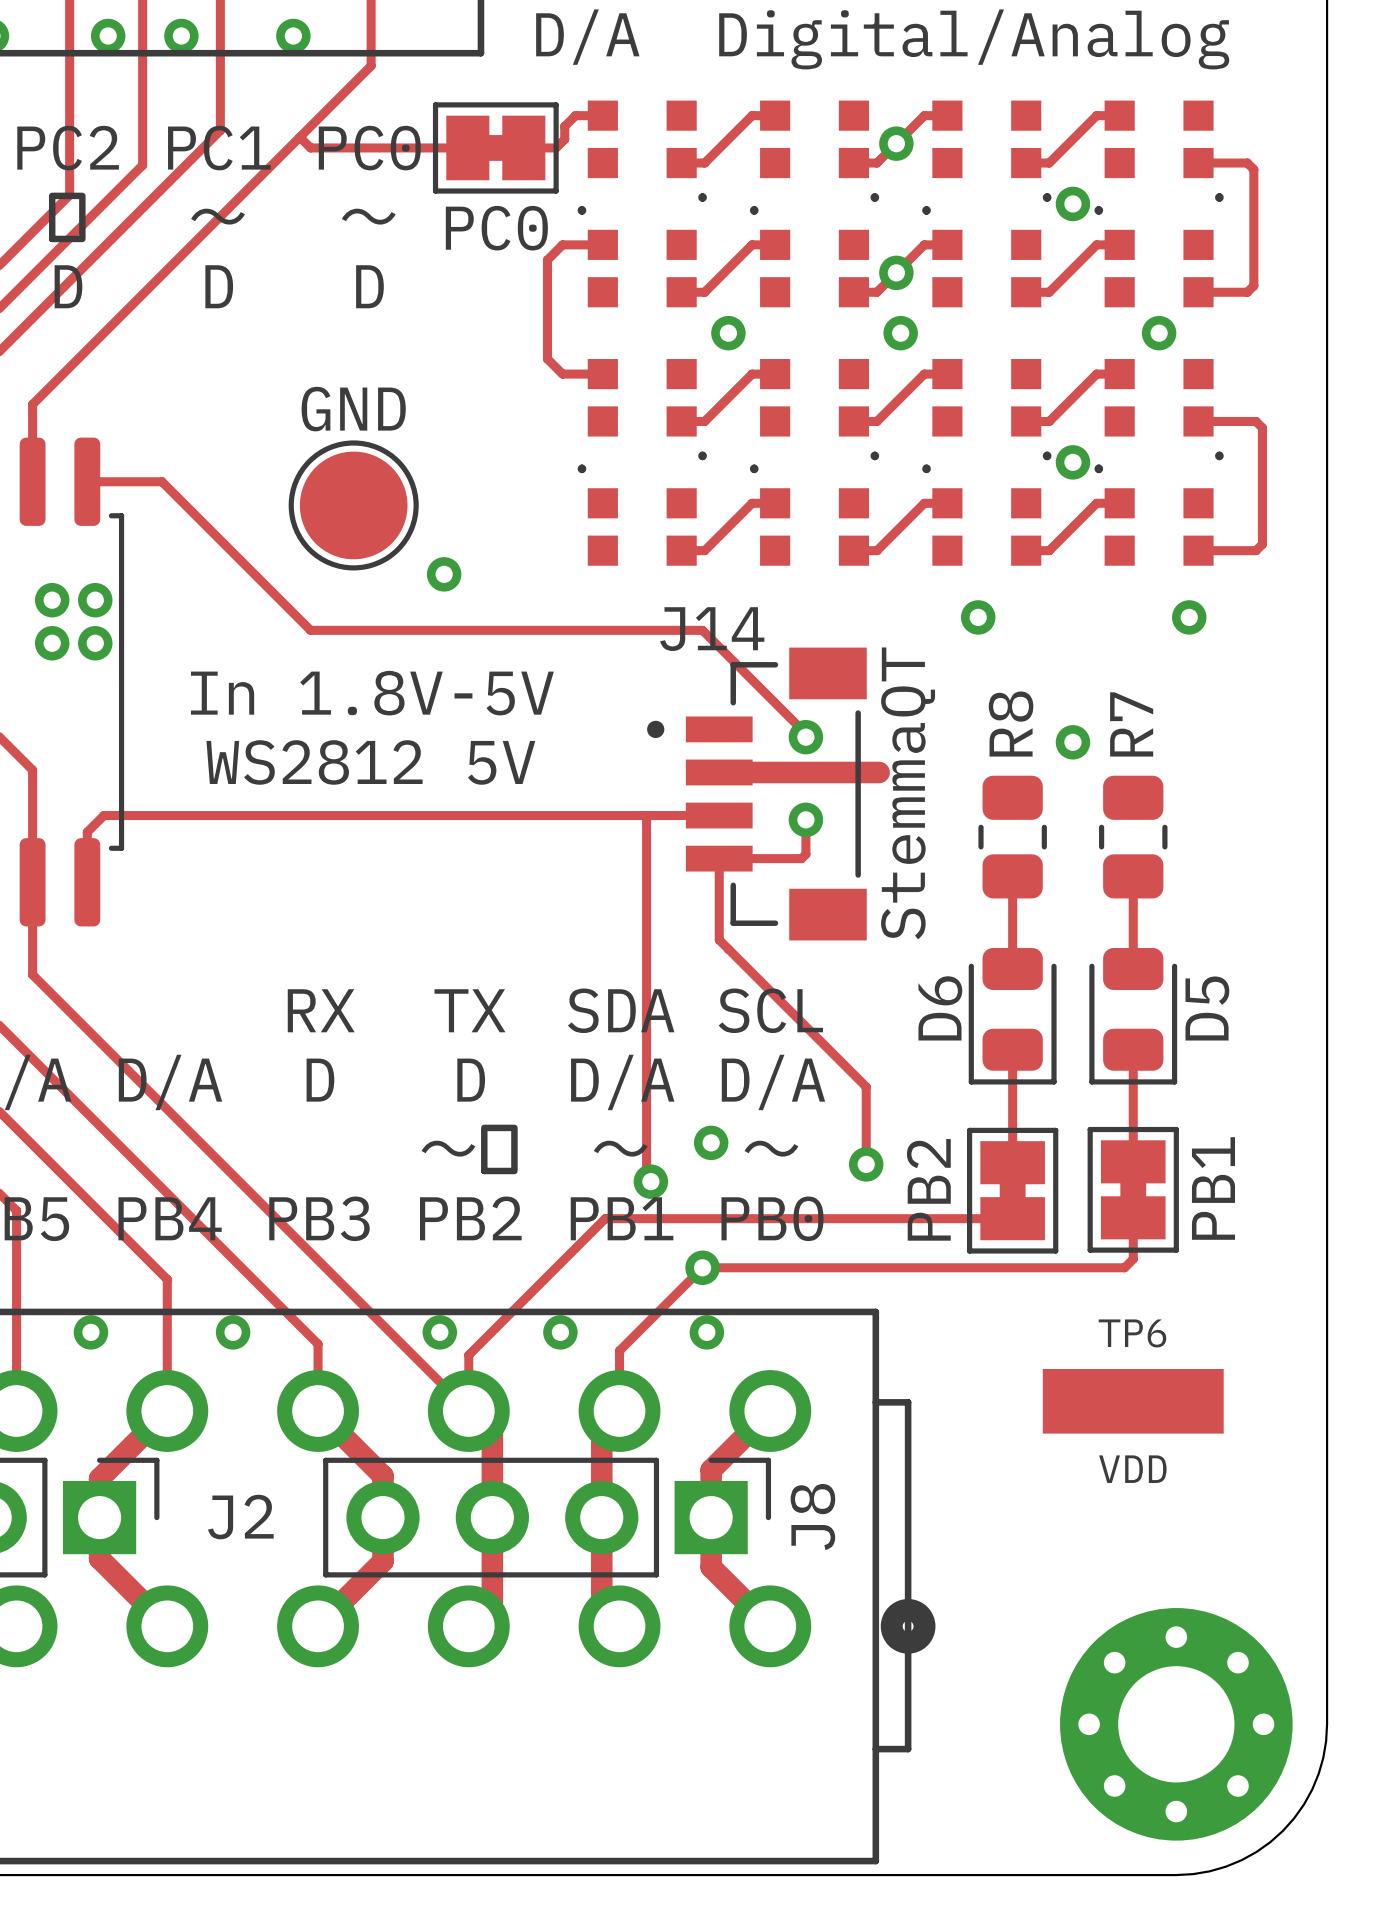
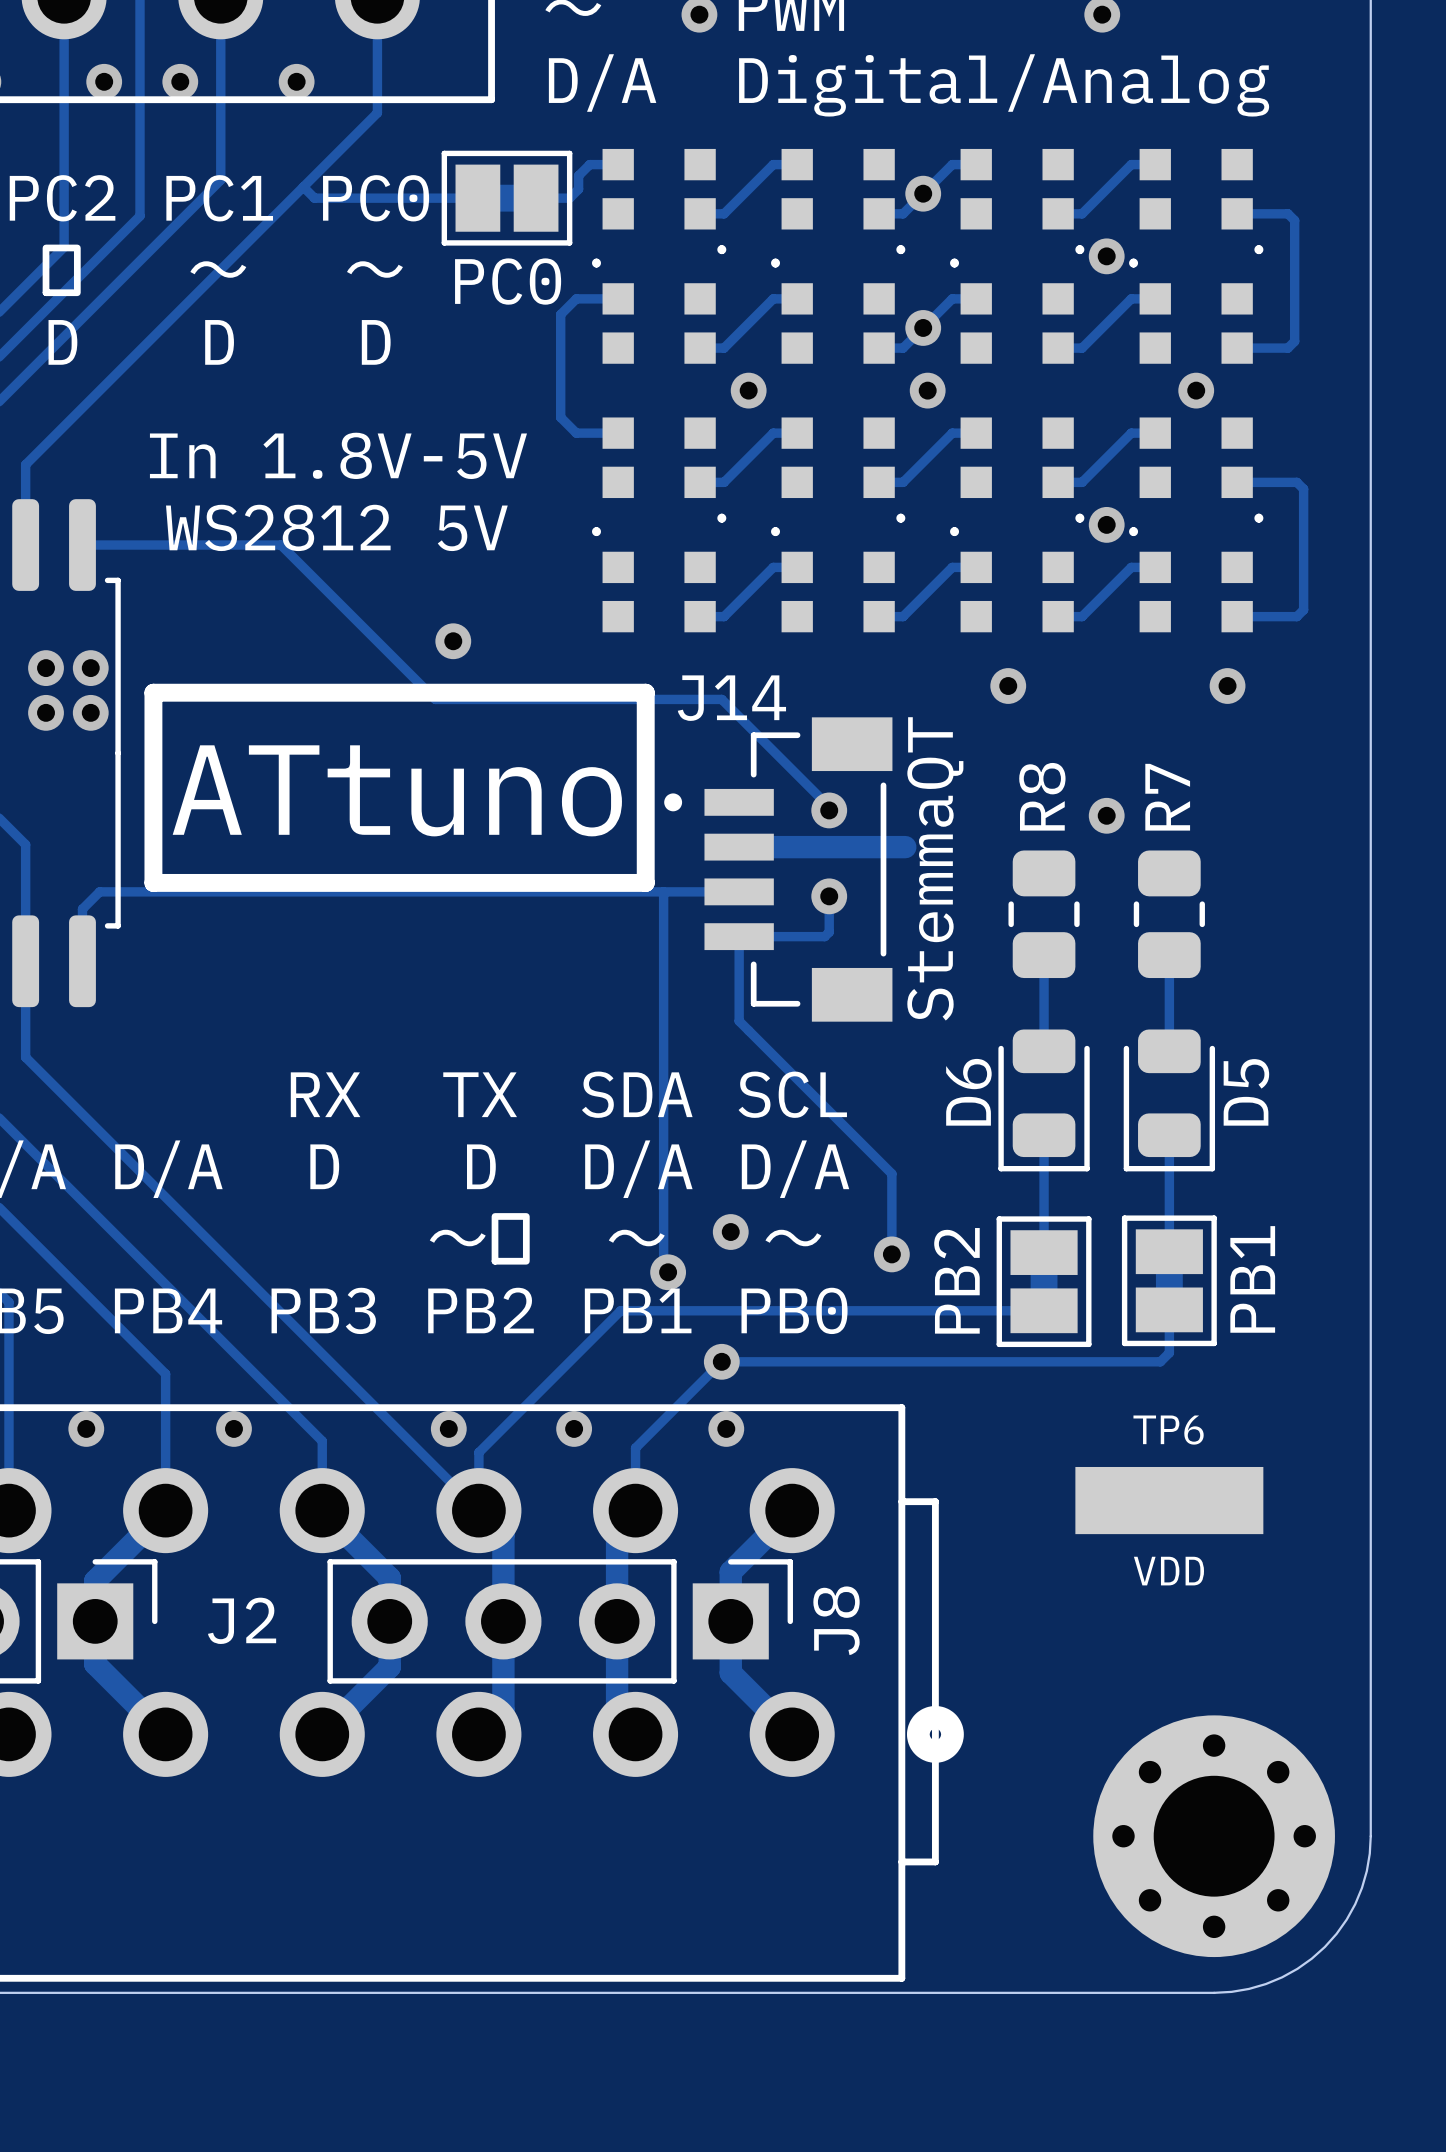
track: (162, 481) (310, 630) (426, 630) -> (160, 545) (280, 545) (435, 699)
part: GND (353, 505) -> none
line: none -> (153, 692) (645, 692) (645, 882) (153, 882) (153, 692)
text position: In 1.8V-5V (372, 693) -> In 1.8V-5V (338, 455)
text: none -> ATtuno (397, 790)
text position: WS2812 5V (370, 762) -> WS2812 5V (336, 527)

